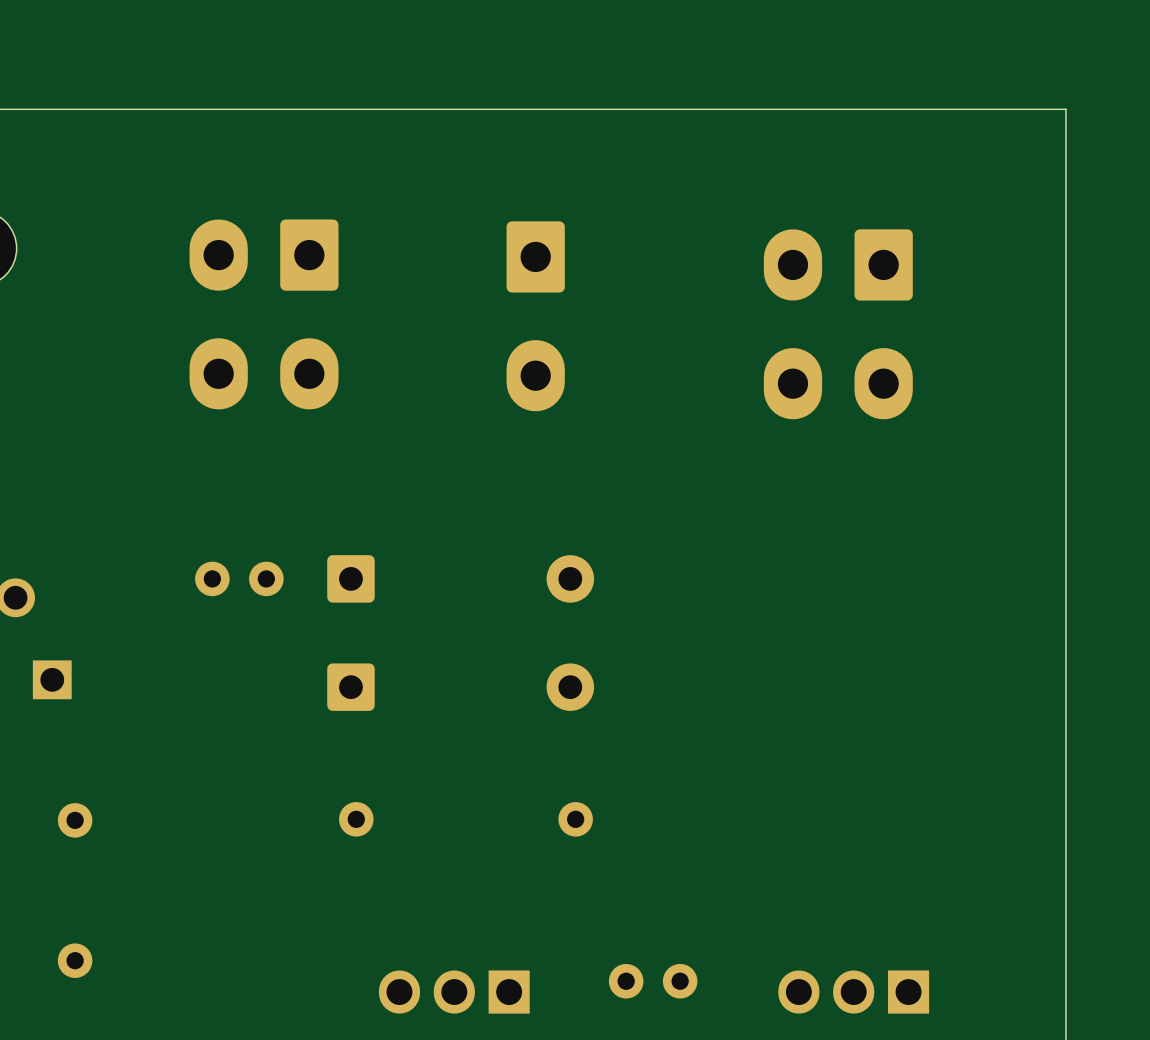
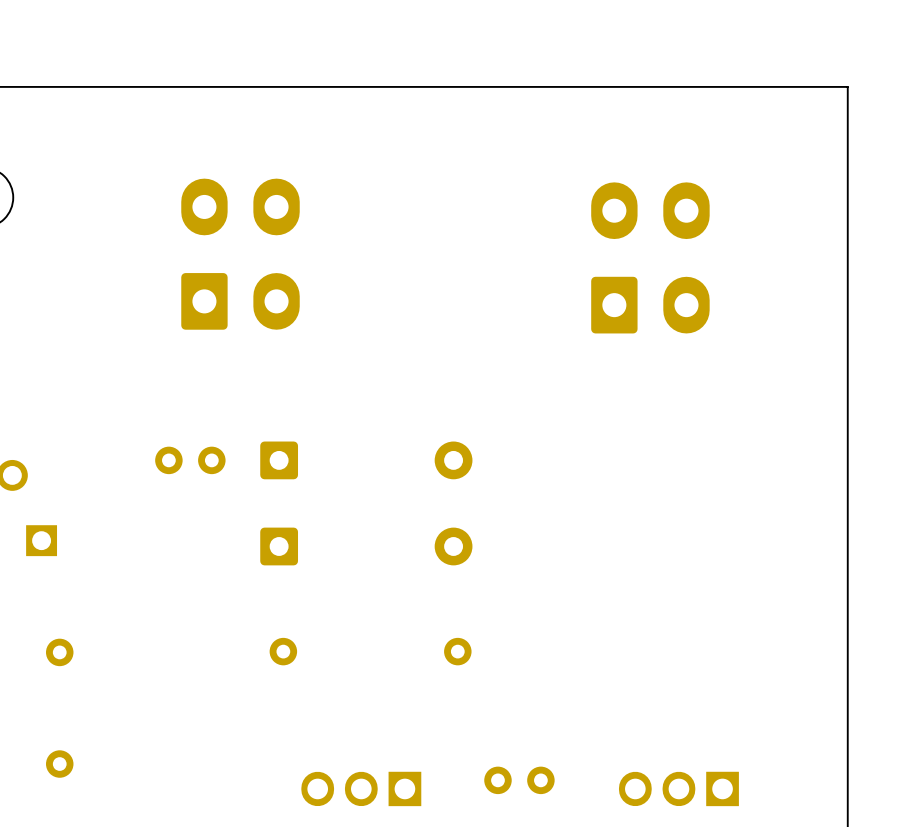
part rotation: 0° (264, 314) -> 180° (240, 254)
part: (535, 316) -> none
part rotation: 0° (838, 324) -> 180° (650, 257)

